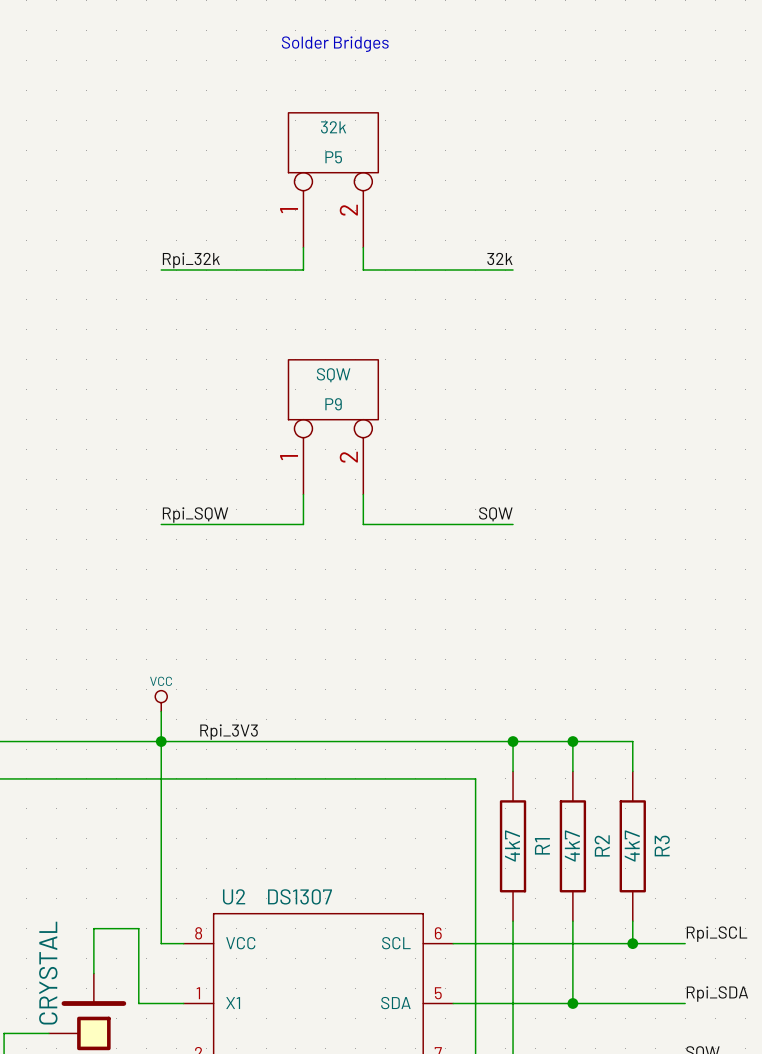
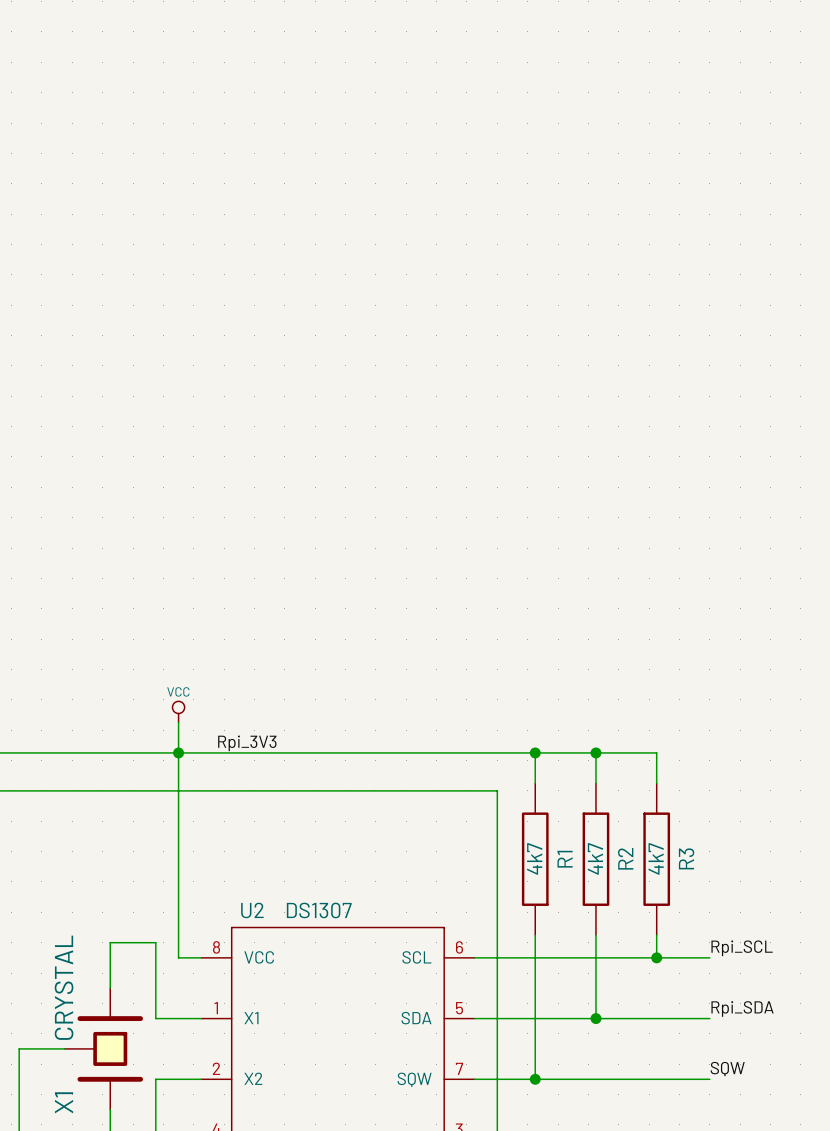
text: Solder Bridges (335, 44) -> none
P5: 32k (333, 180) -> none
wire: (303, 247) (303, 270) (161, 270) -> none
wire: (363, 247) (363, 270) (513, 270) -> none
label: 32k (499, 258) -> none
label: Rpi_32k (191, 260) -> none
P9: SQW (333, 427) -> none
wire: (303, 494) (303, 524) (161, 524) -> none
wire: (363, 494) (363, 524) (513, 524) -> none
label: SQW (495, 514) -> none
label: Rpi_SQW (195, 515) -> none

